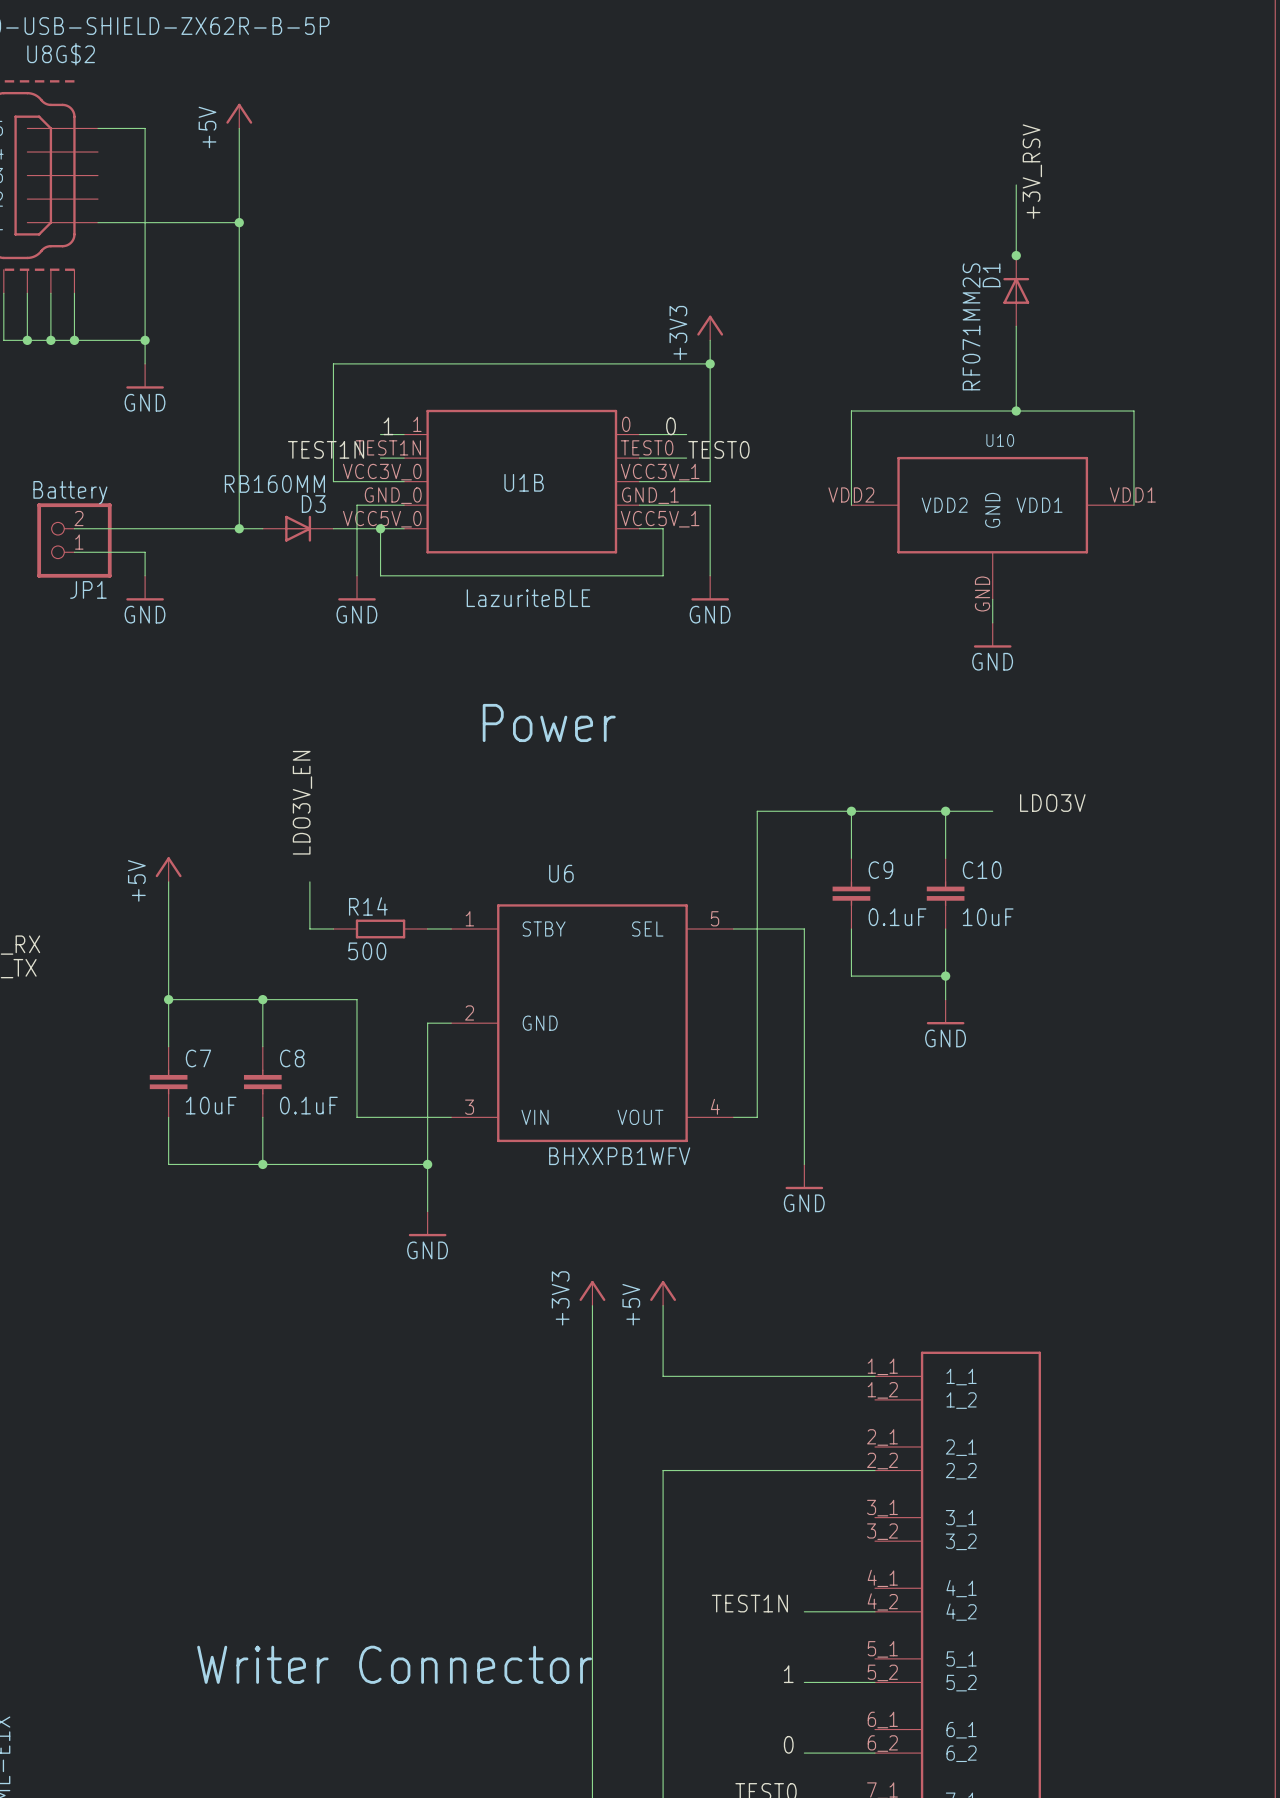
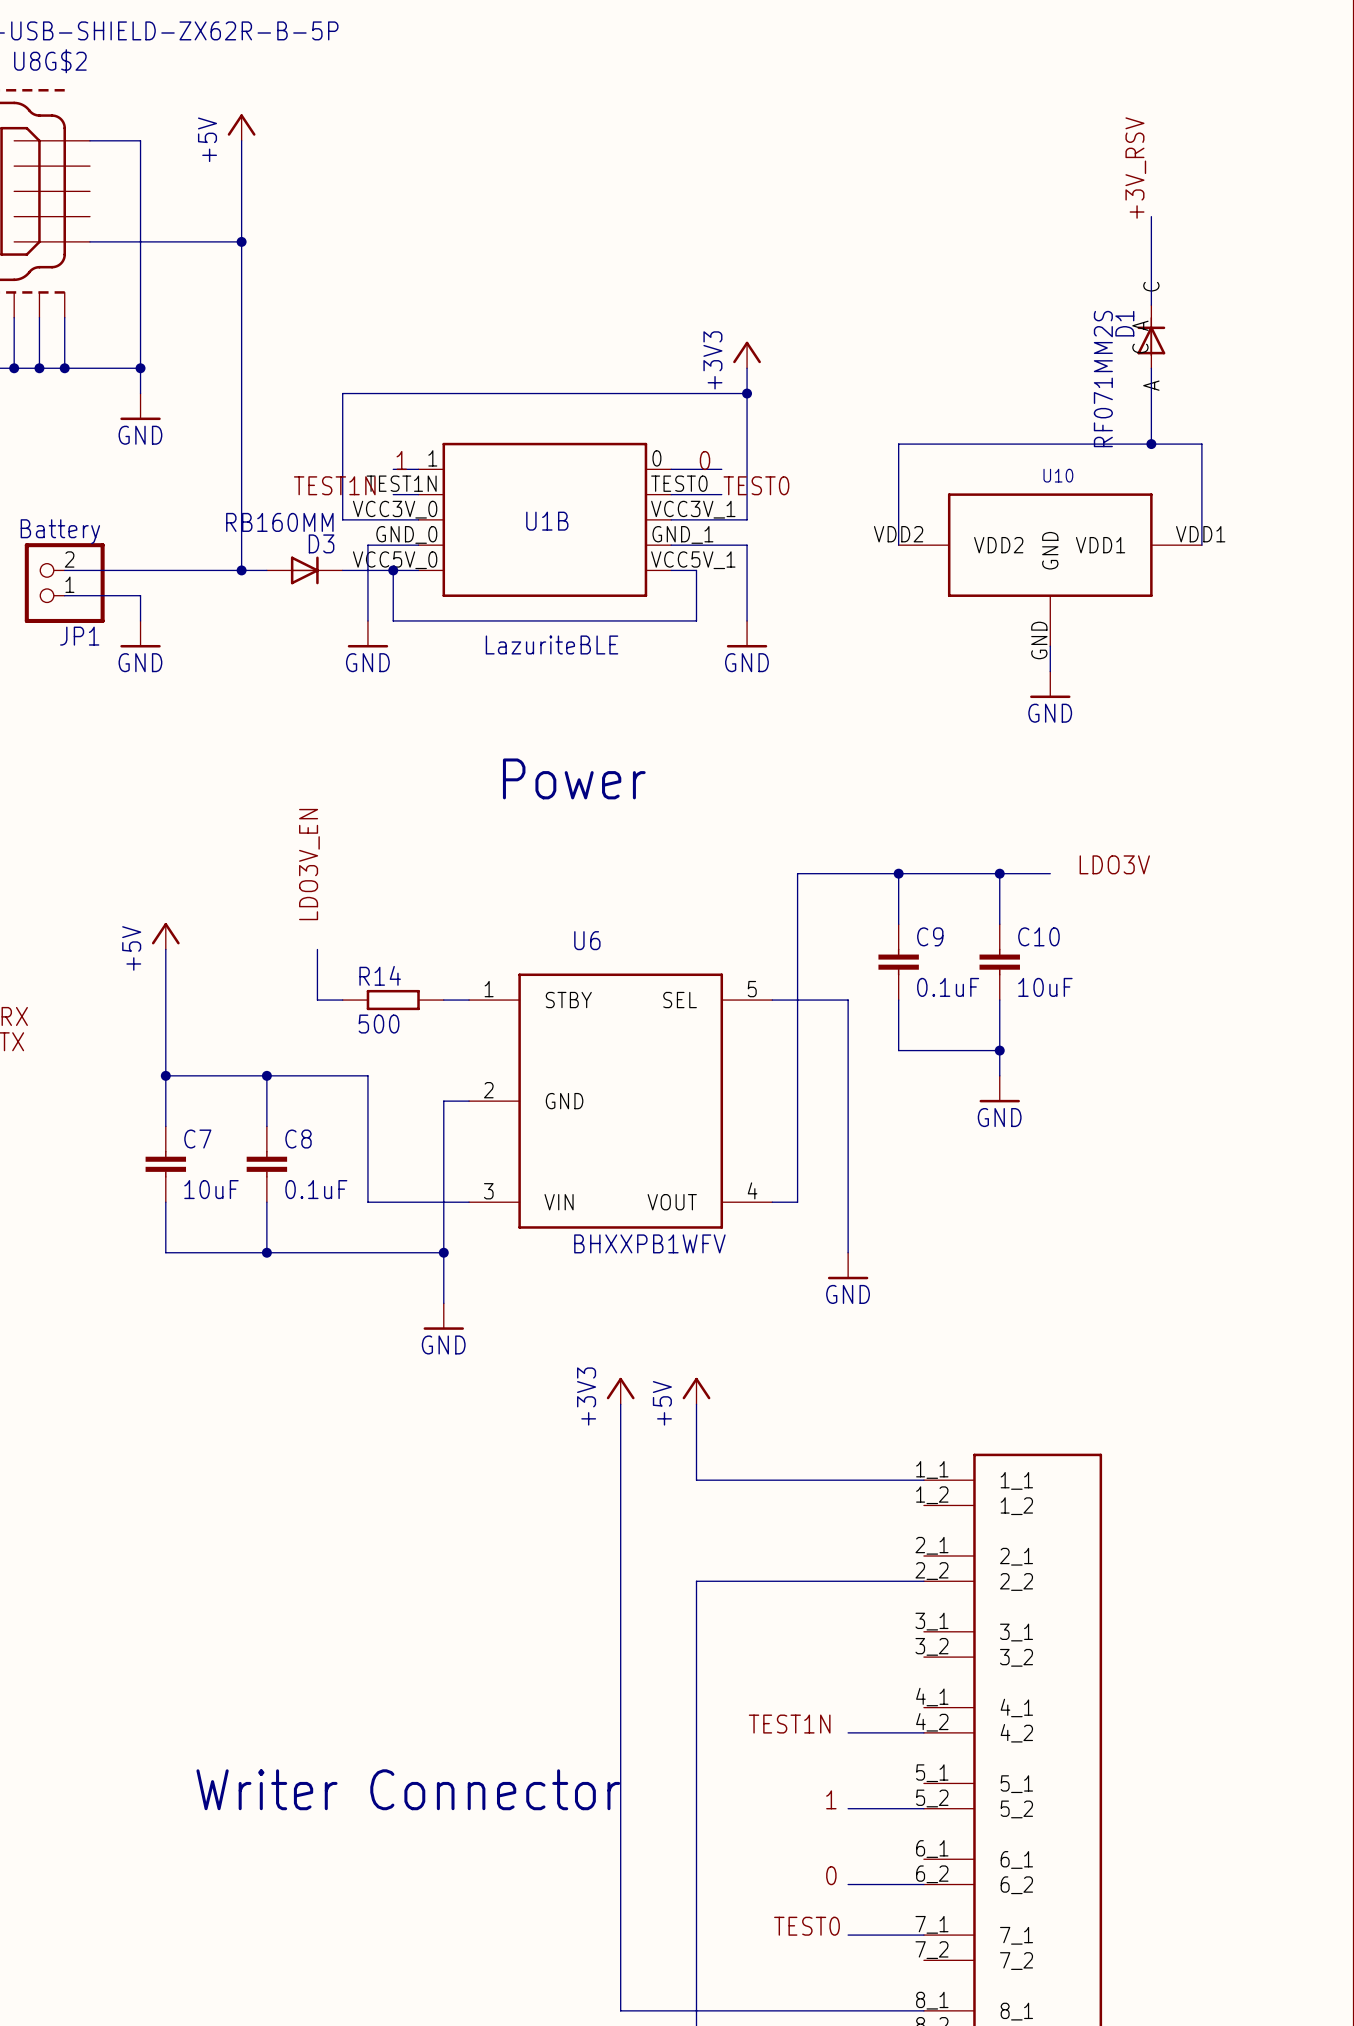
label position: +3V_RSV (1032, 171) -> +3V_RSV (1135, 168)
wire: (1016, 184) (1016, 255) -> (1151, 368) (1151, 444)
wire: none -> (1151, 216) (1151, 305)
D1 symbol: [1003, 255, 1030, 327] -> [1137, 305, 1166, 369]
junction: (1016, 255) -> none
wire: (1016, 326) (1016, 411) -> none
junction: (1016, 411) -> none
junction: none -> (1151, 444)

